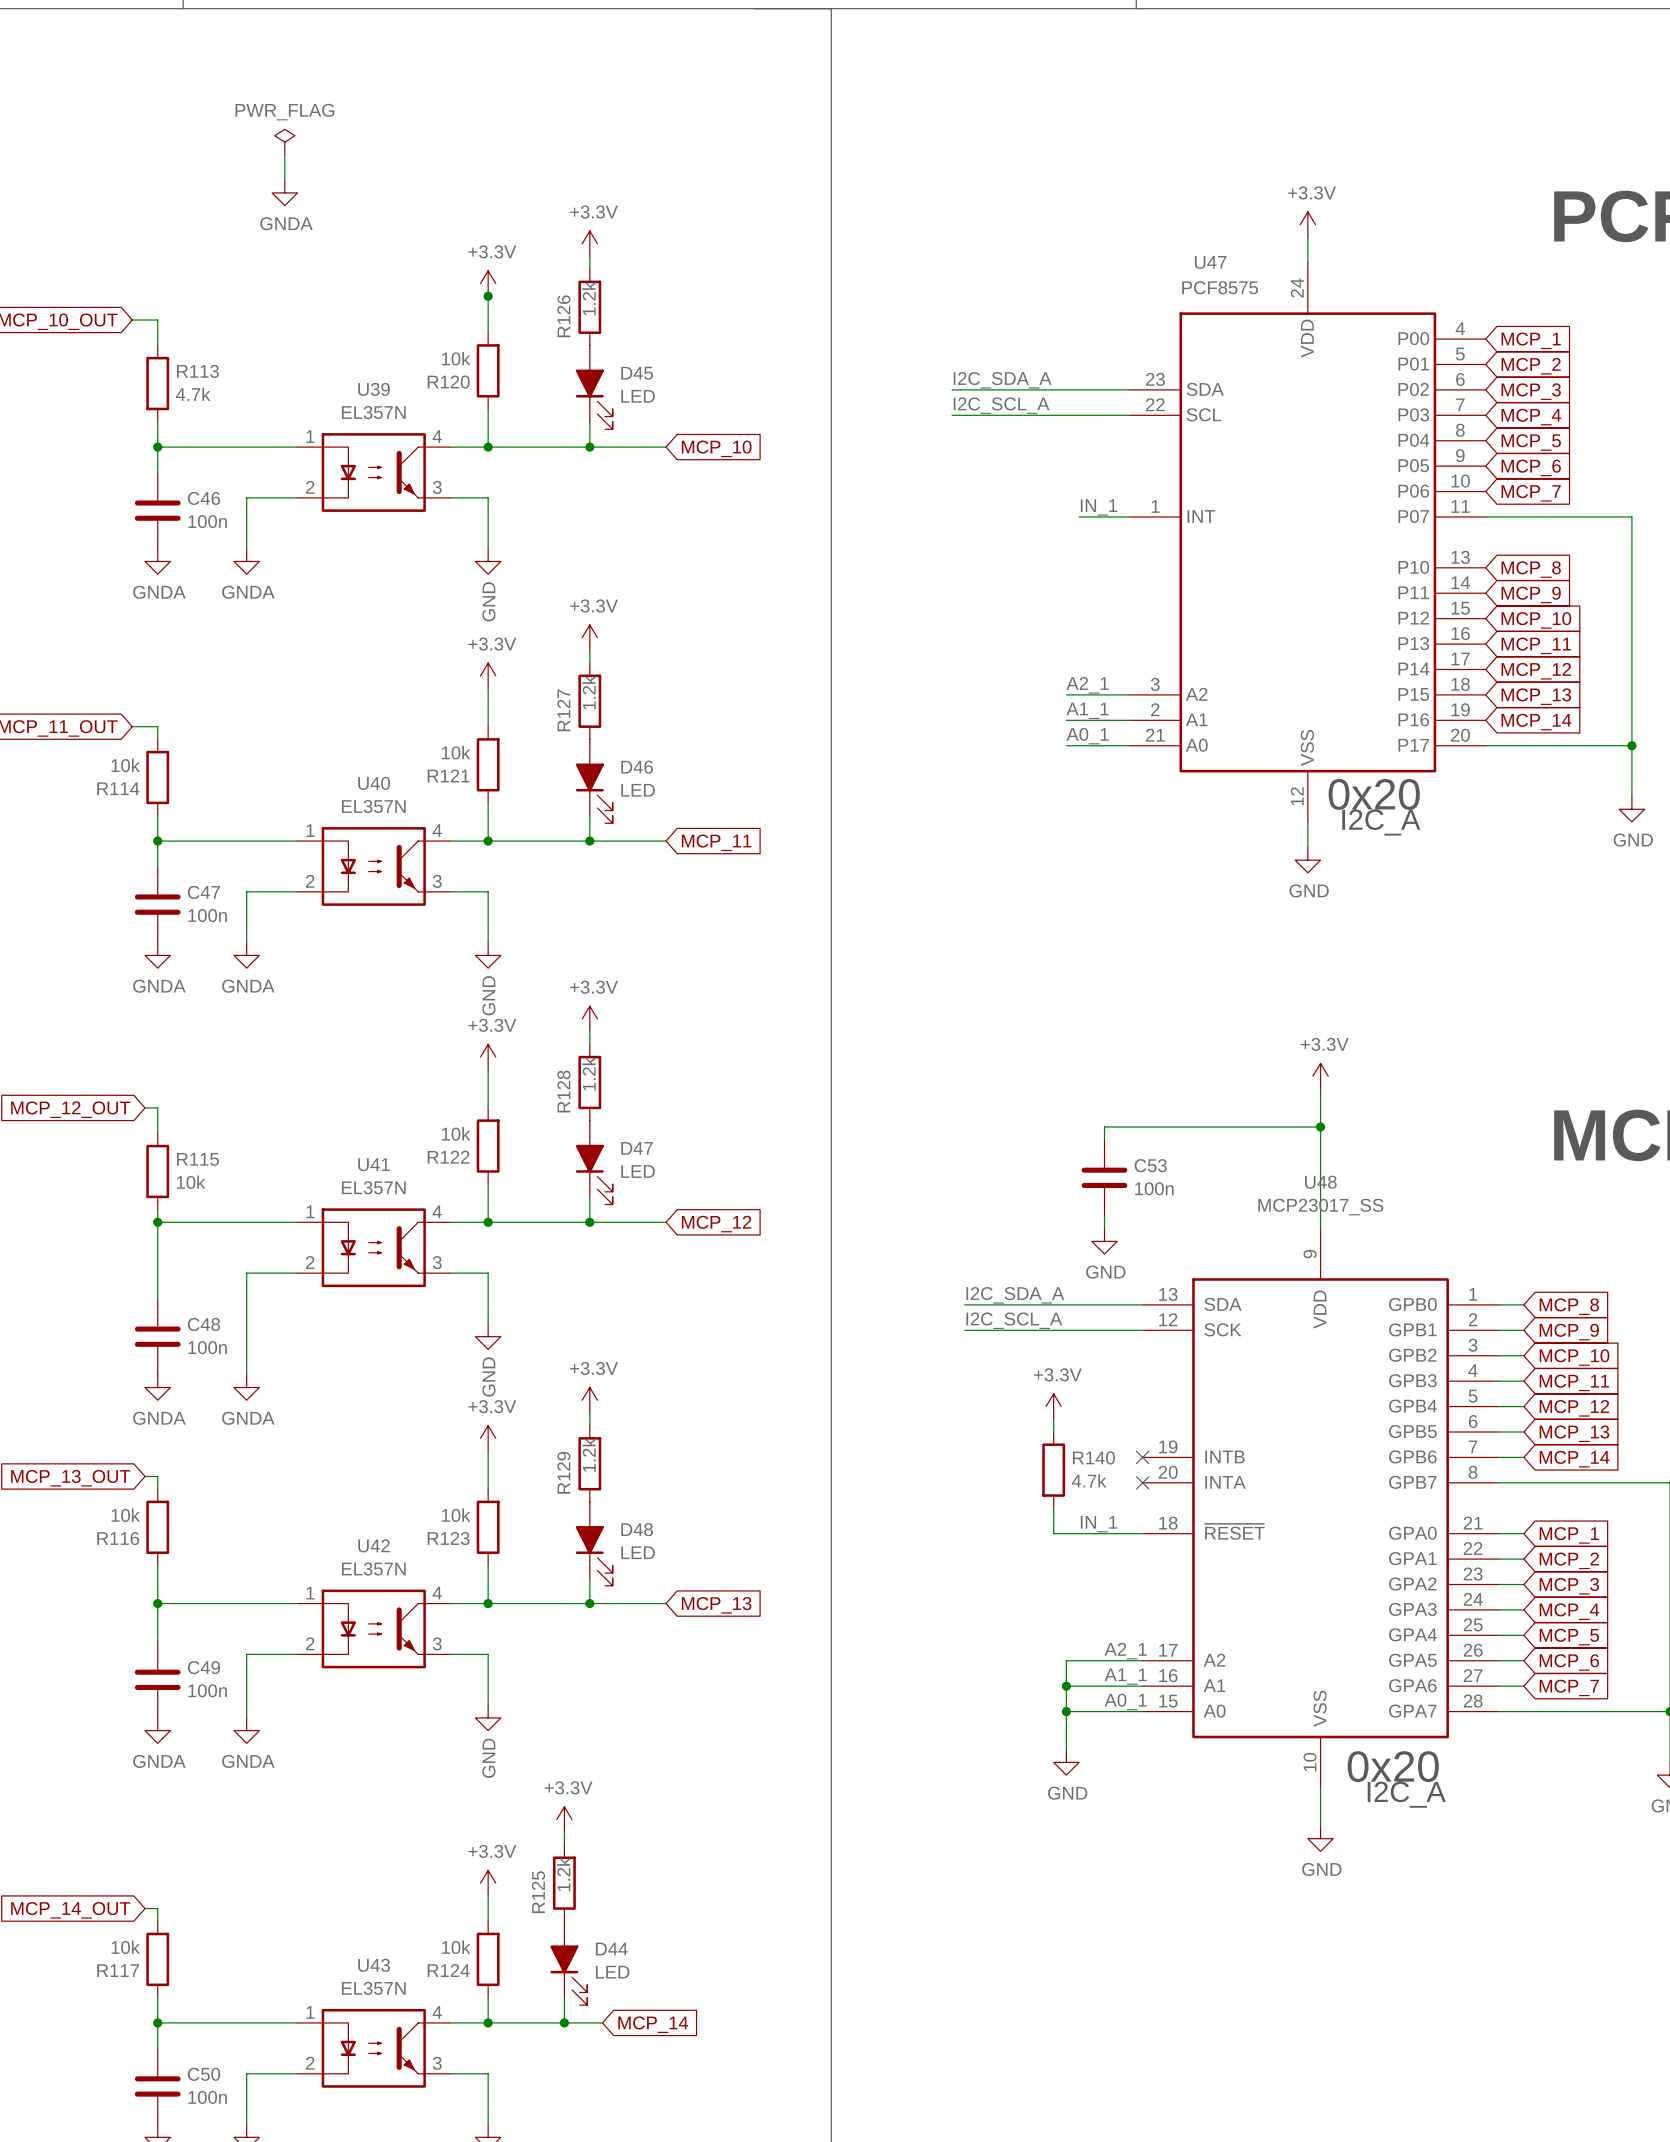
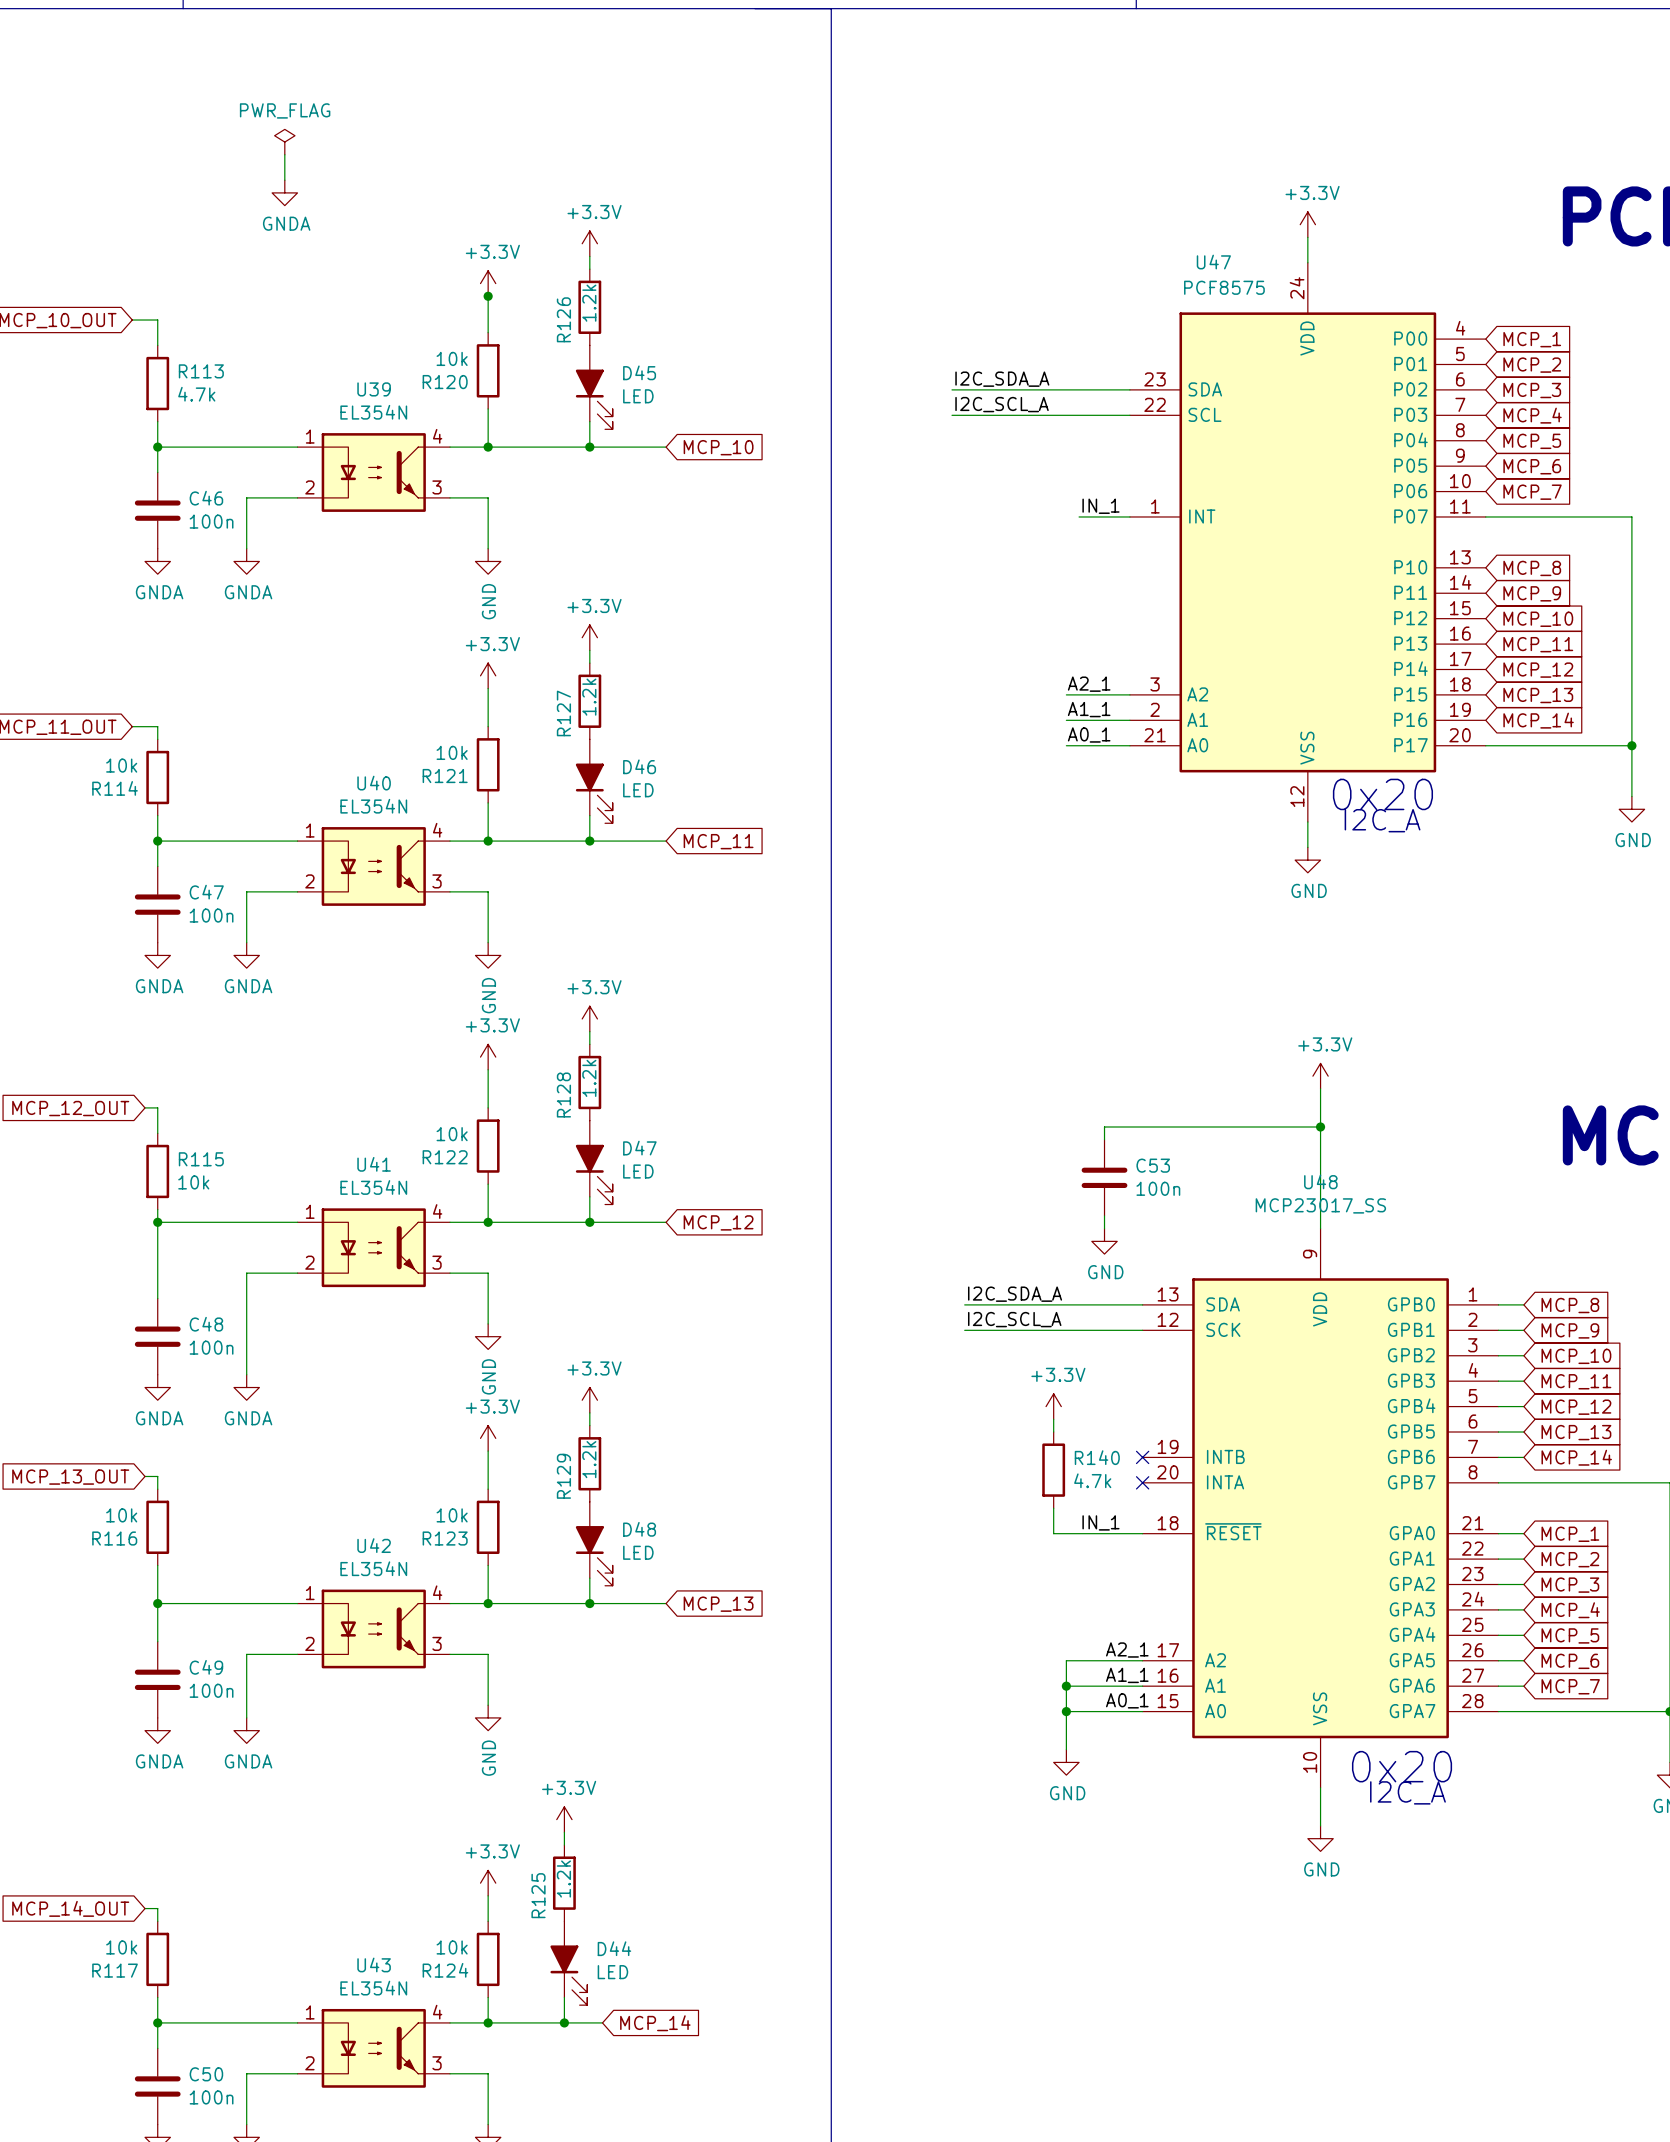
U39 value: EL357N (373, 412) -> EL354N (373, 412)
U40 value: EL357N (373, 806) -> EL354N (373, 806)
U41 value: EL357N (373, 1187) -> EL354N (373, 1187)
U42 value: EL357N (373, 1569) -> EL354N (373, 1568)
U43 value: EL357N (373, 1988) -> EL354N (373, 1988)

